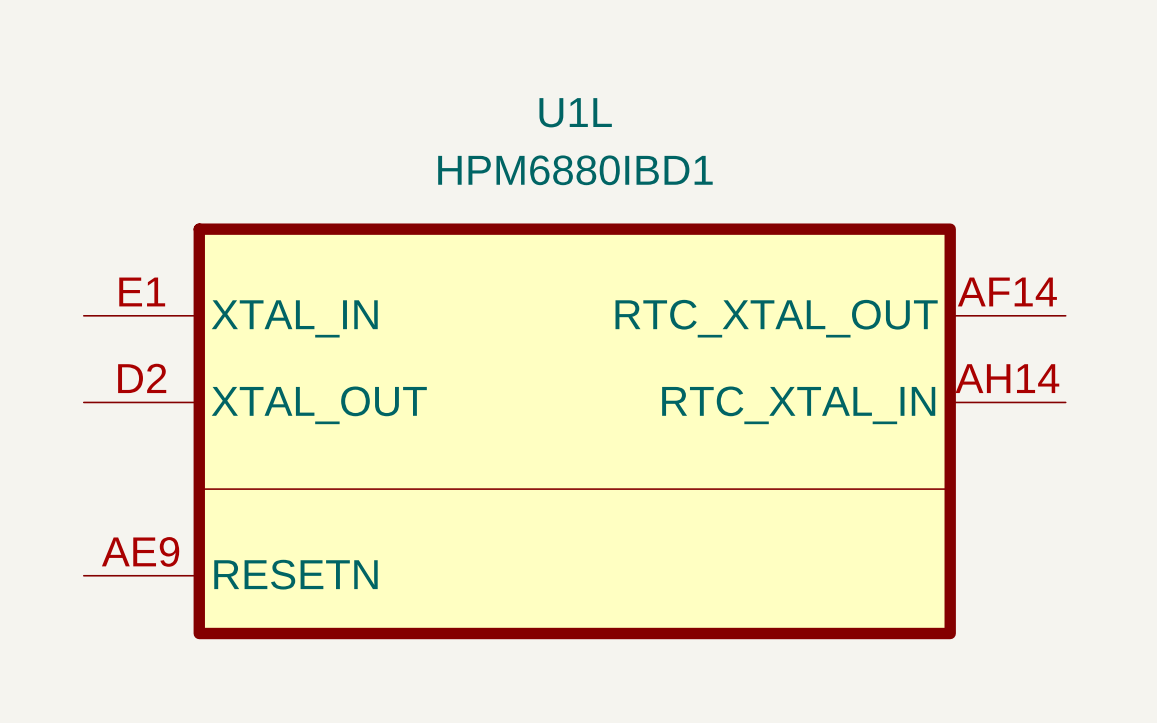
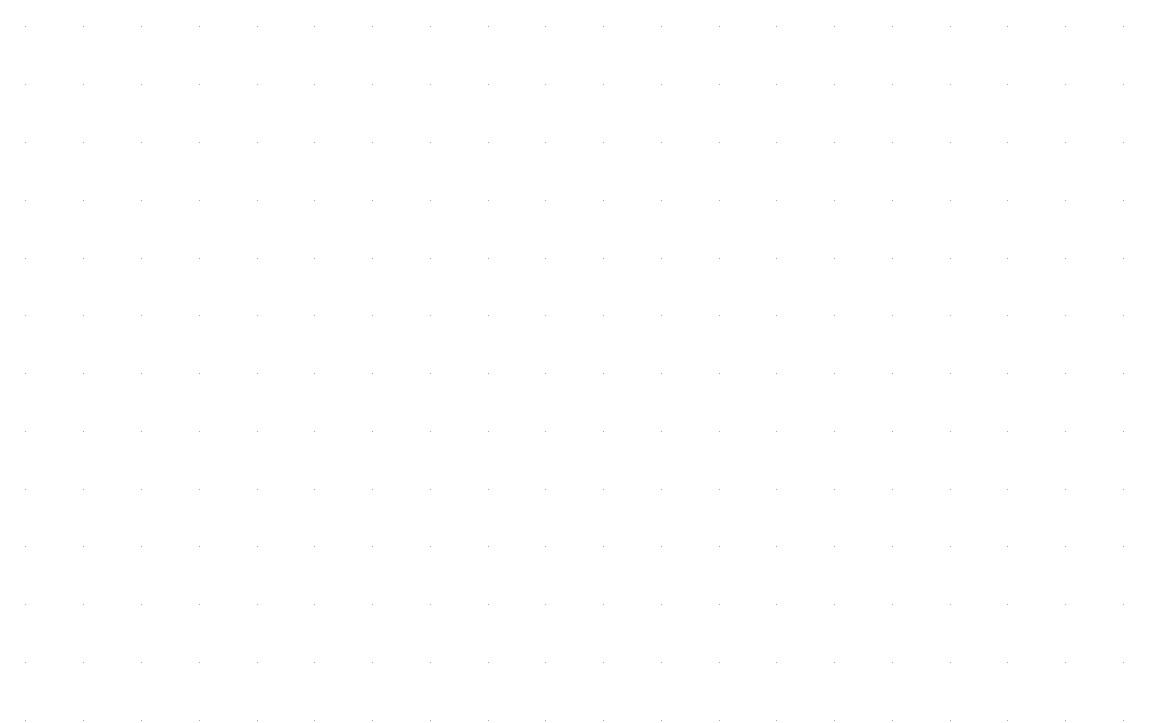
U1L: HPM6880IBD1 (574, 431) -> none

